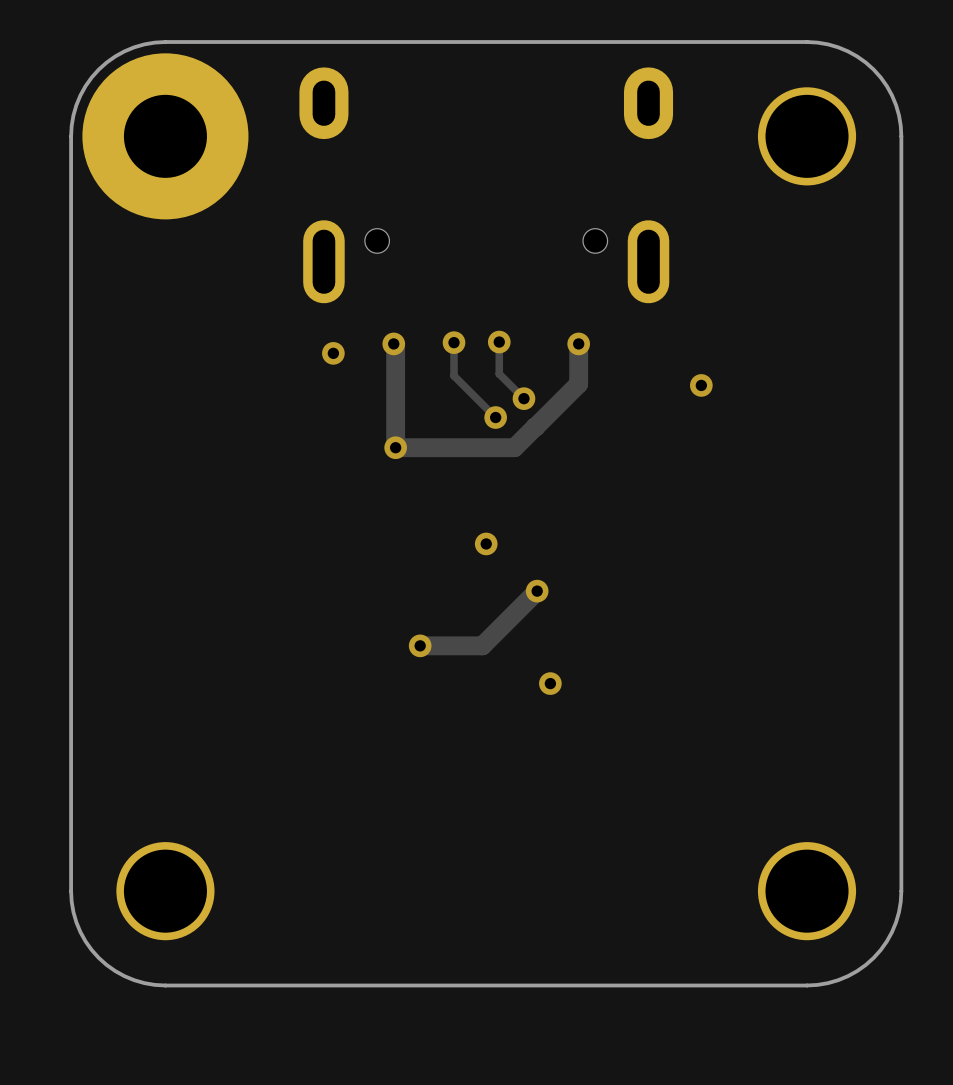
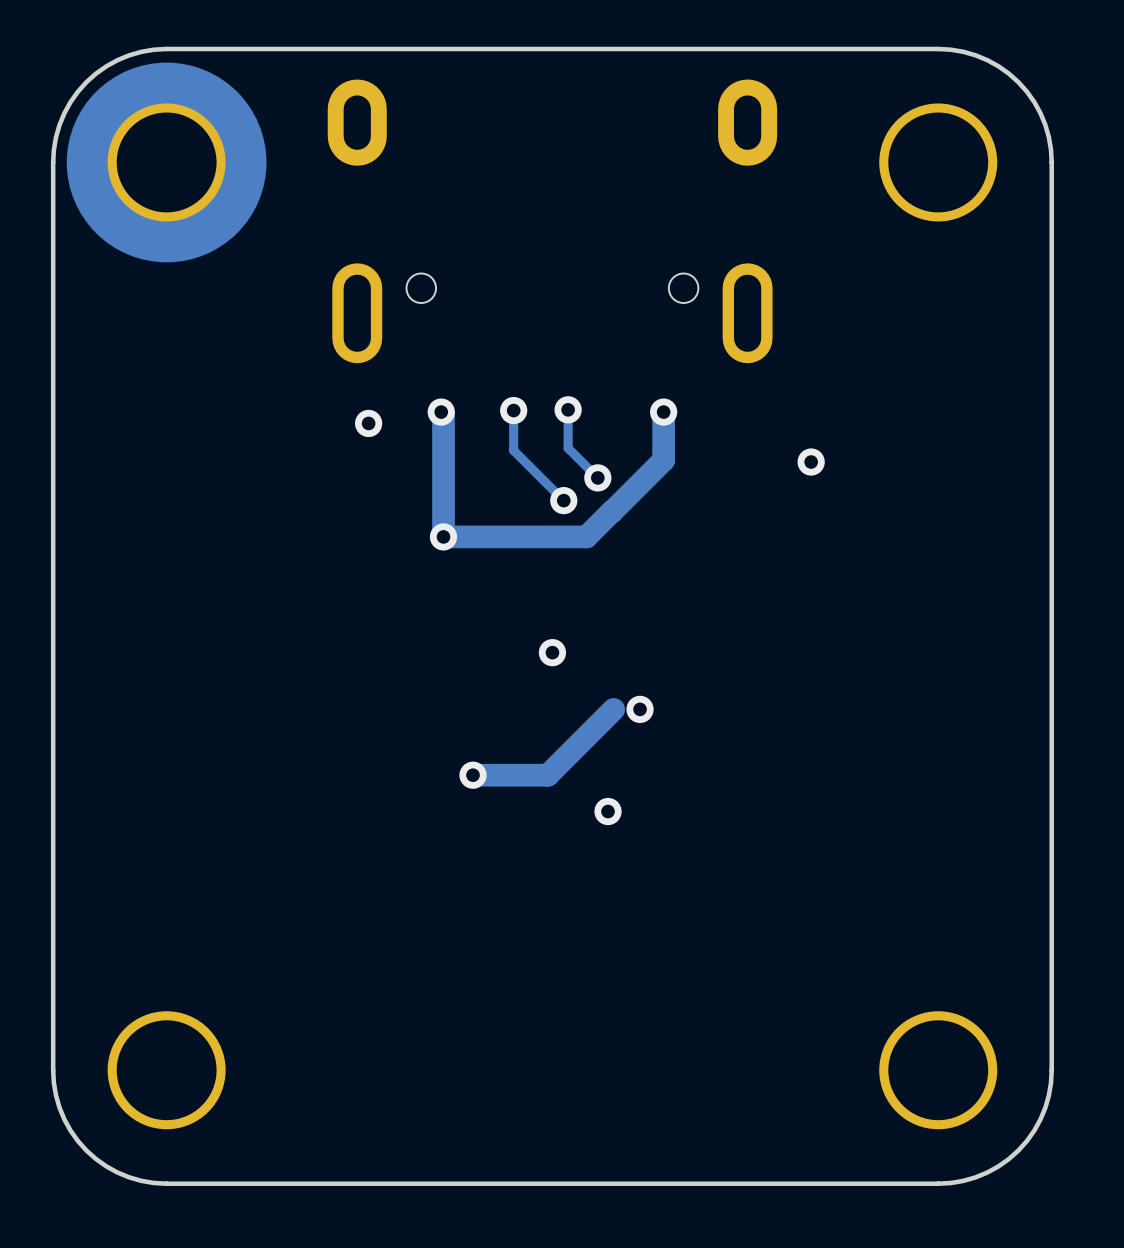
via position: (537, 591) -> (640, 709)
via position: (550, 683) -> (608, 811)

